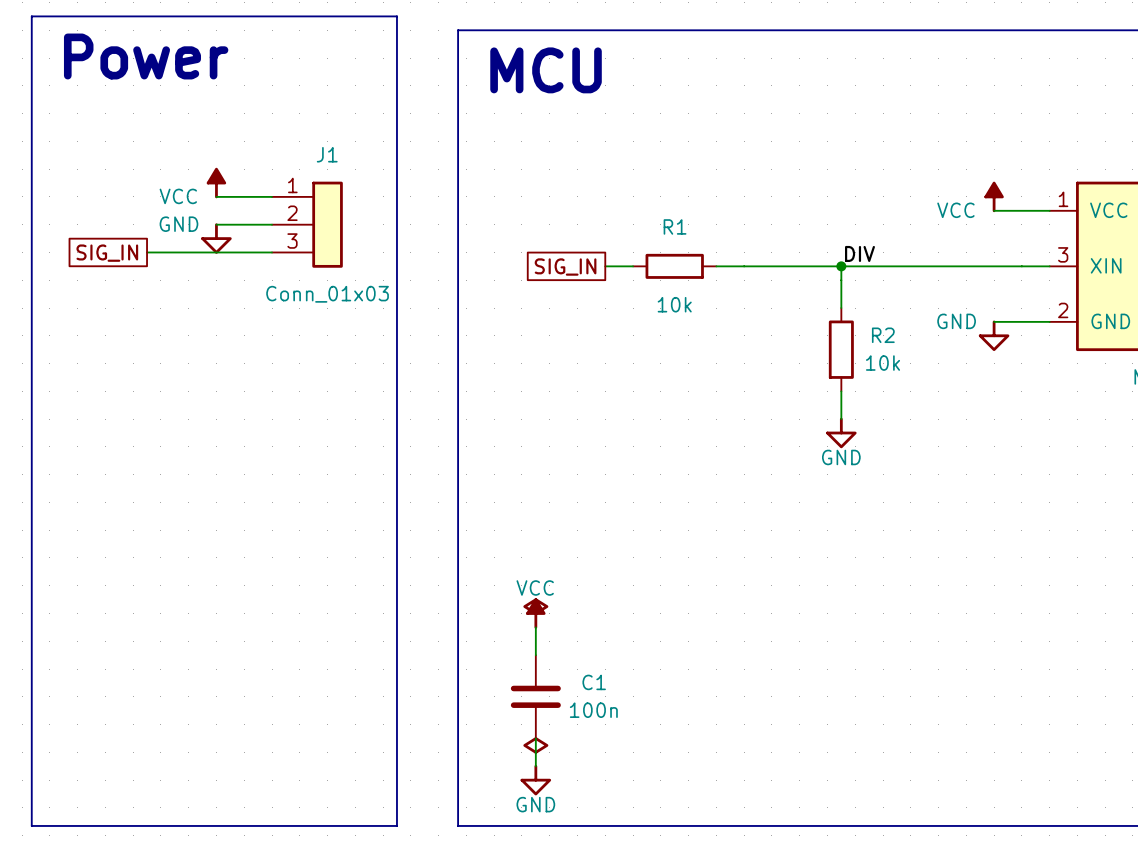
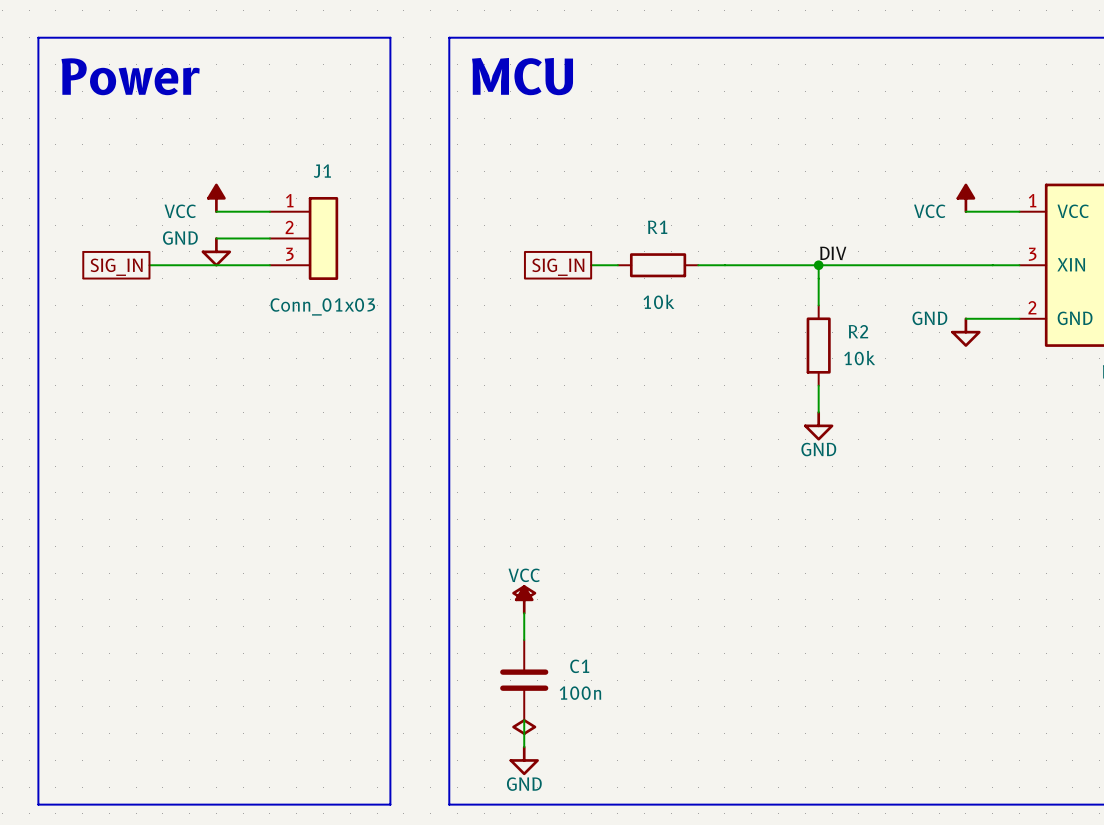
line: (31, 30) (31, 16) (396, 16) (396, 30) -> (38, 37) (390, 37)
text position: Power (146, 56) -> Power (130, 76)
power symbol position: VCC (216, 183) -> VCC (216, 198)
wire: (216, 196) (272, 196) -> (216, 211) (269, 211)
wire: (216, 224) (272, 224) -> (216, 238) (269, 238)
J1 position: (307, 224) -> (304, 238)
power symbol position: GND (216, 238) -> GND (216, 251)
wire: (147, 252) (272, 252) -> (149, 265) (269, 265)
global label position: SIG_IN (107, 253) -> SIG_IN (116, 267)

